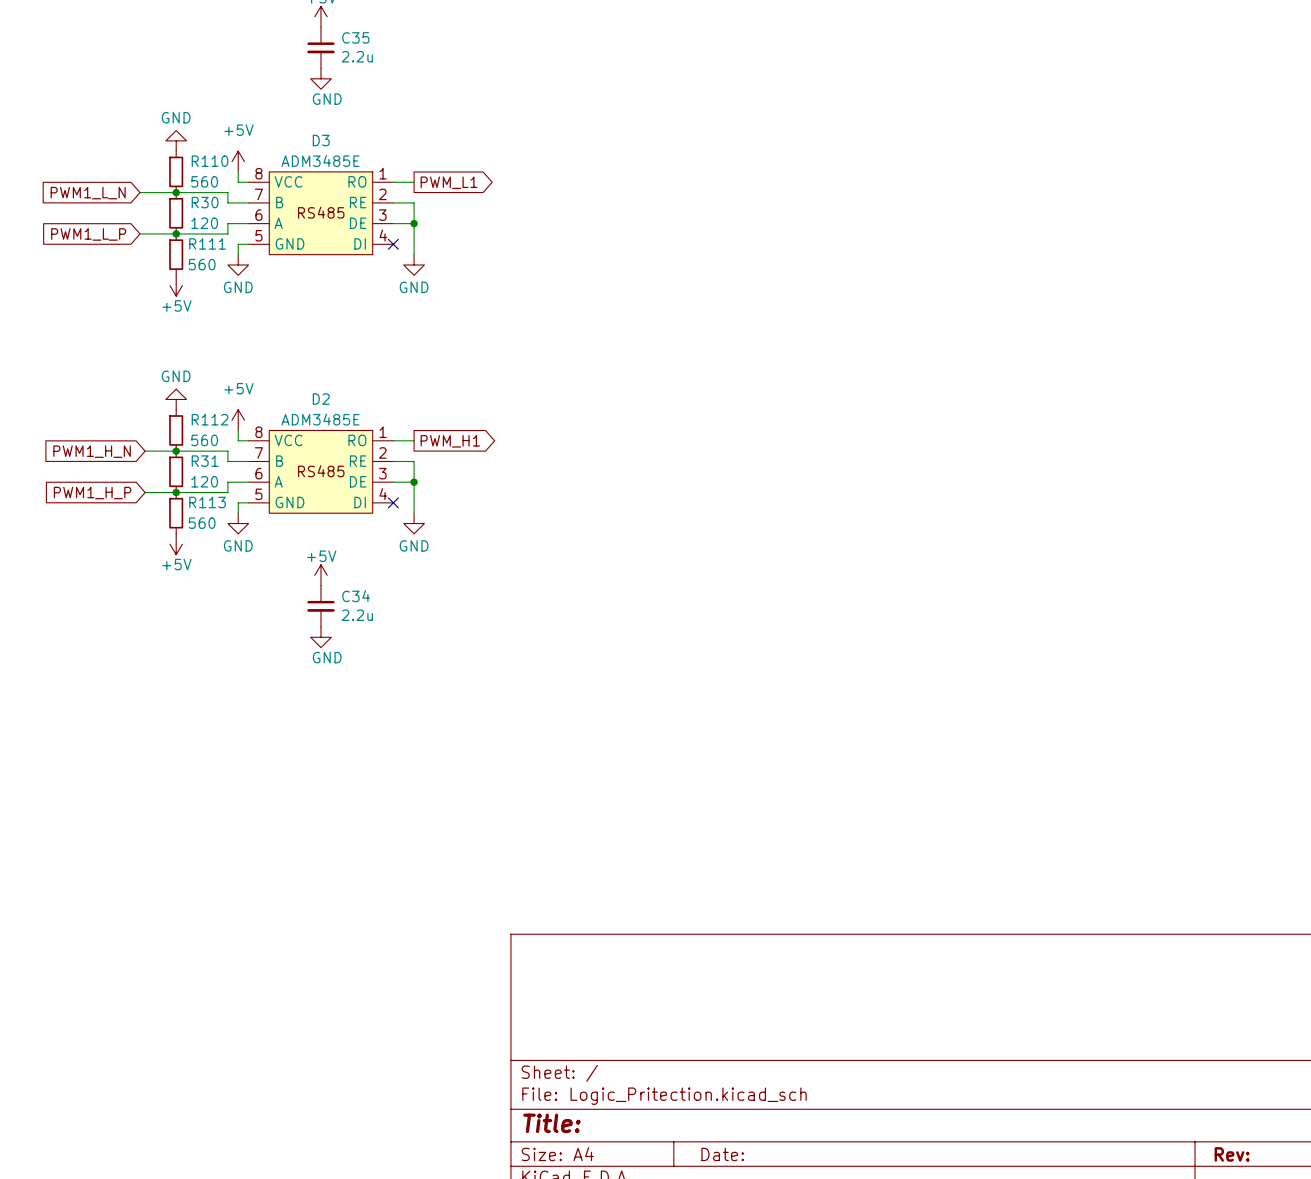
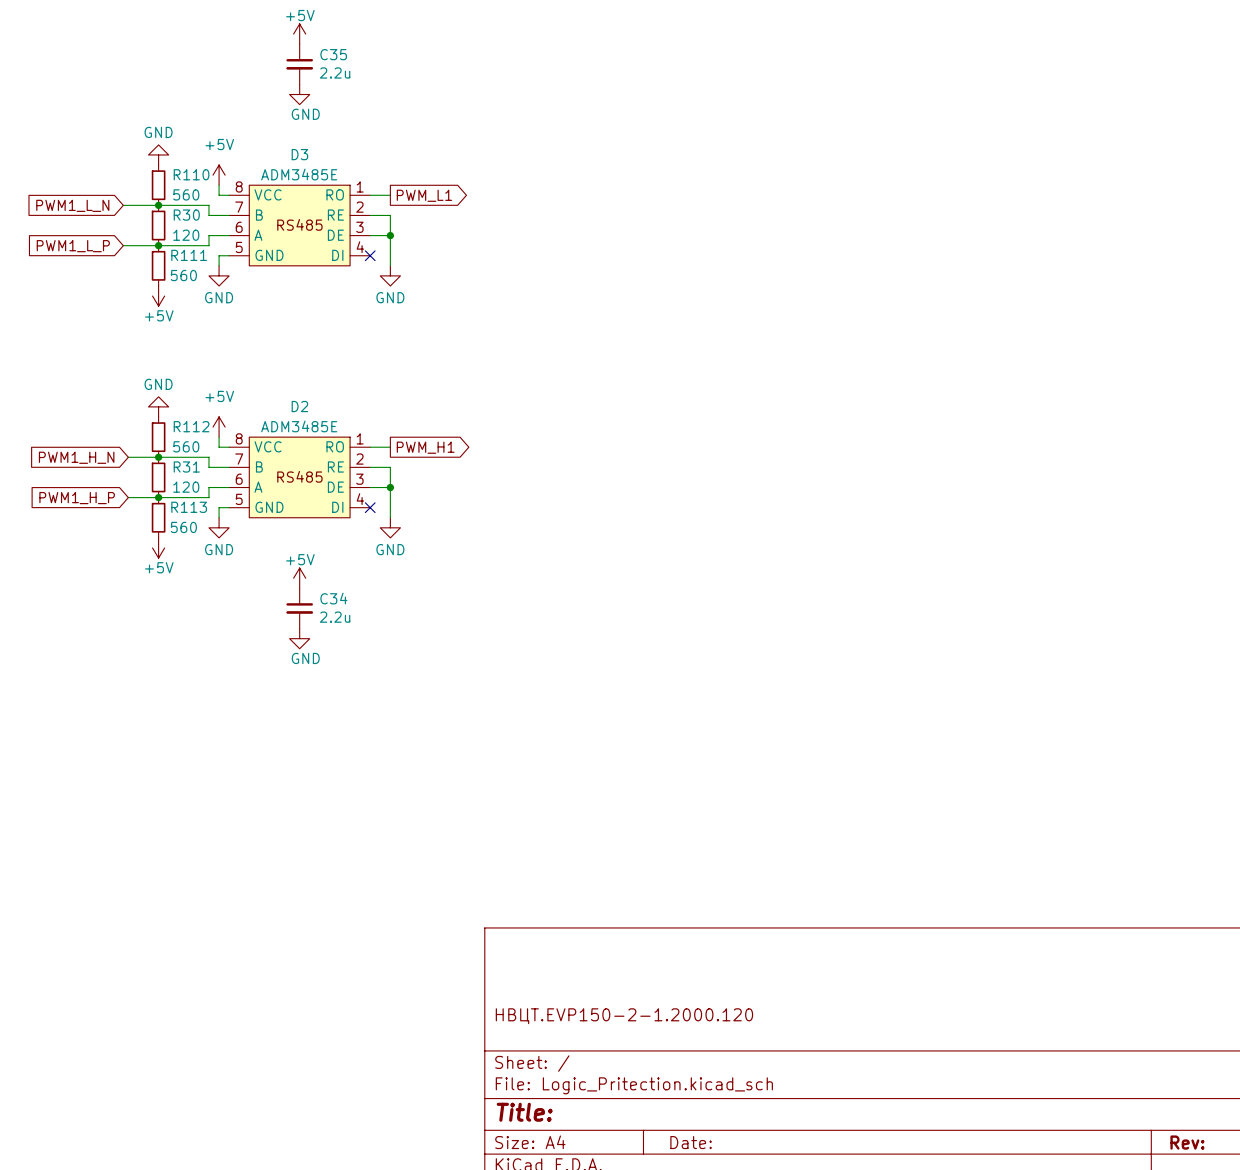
title block: none -> НВЦТ.EVP150-2-1.2000.120 (624, 1016)

